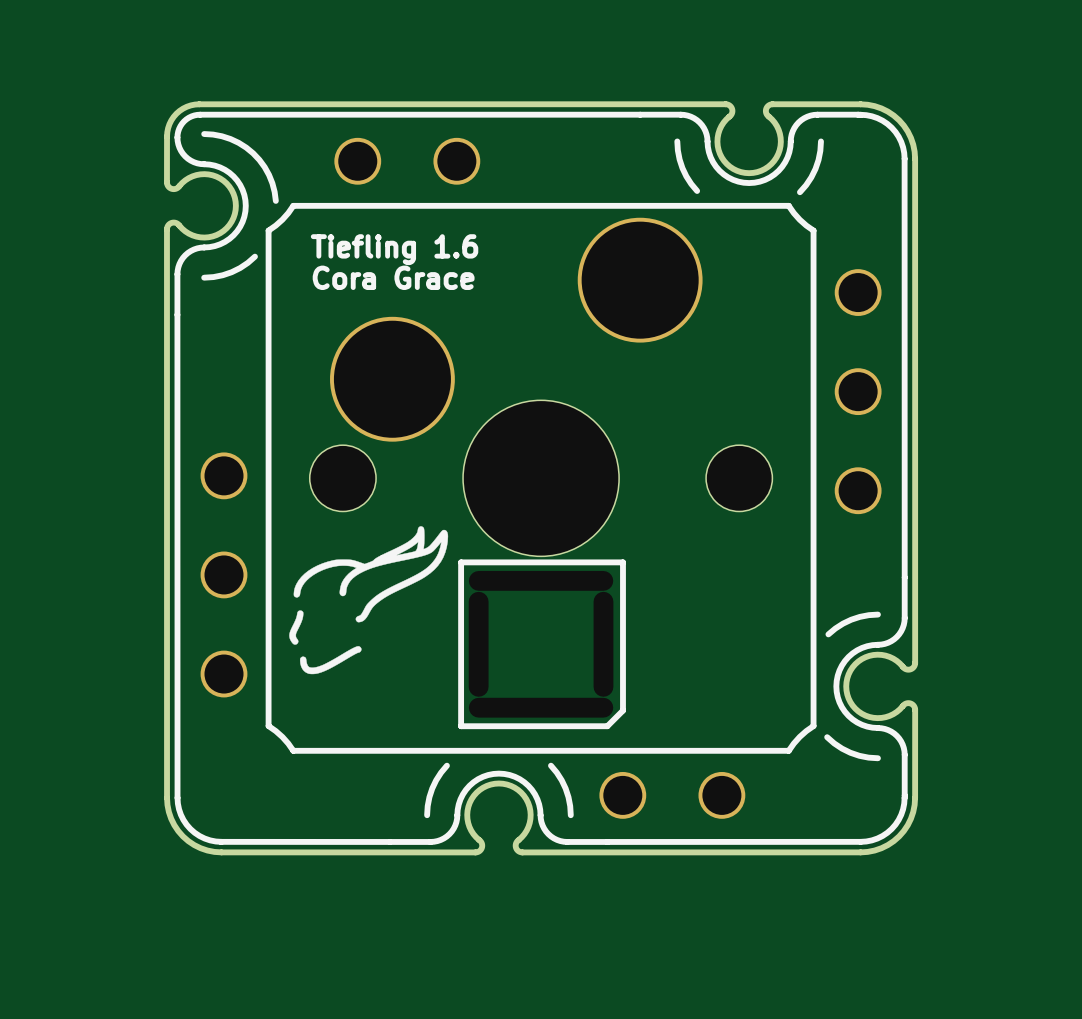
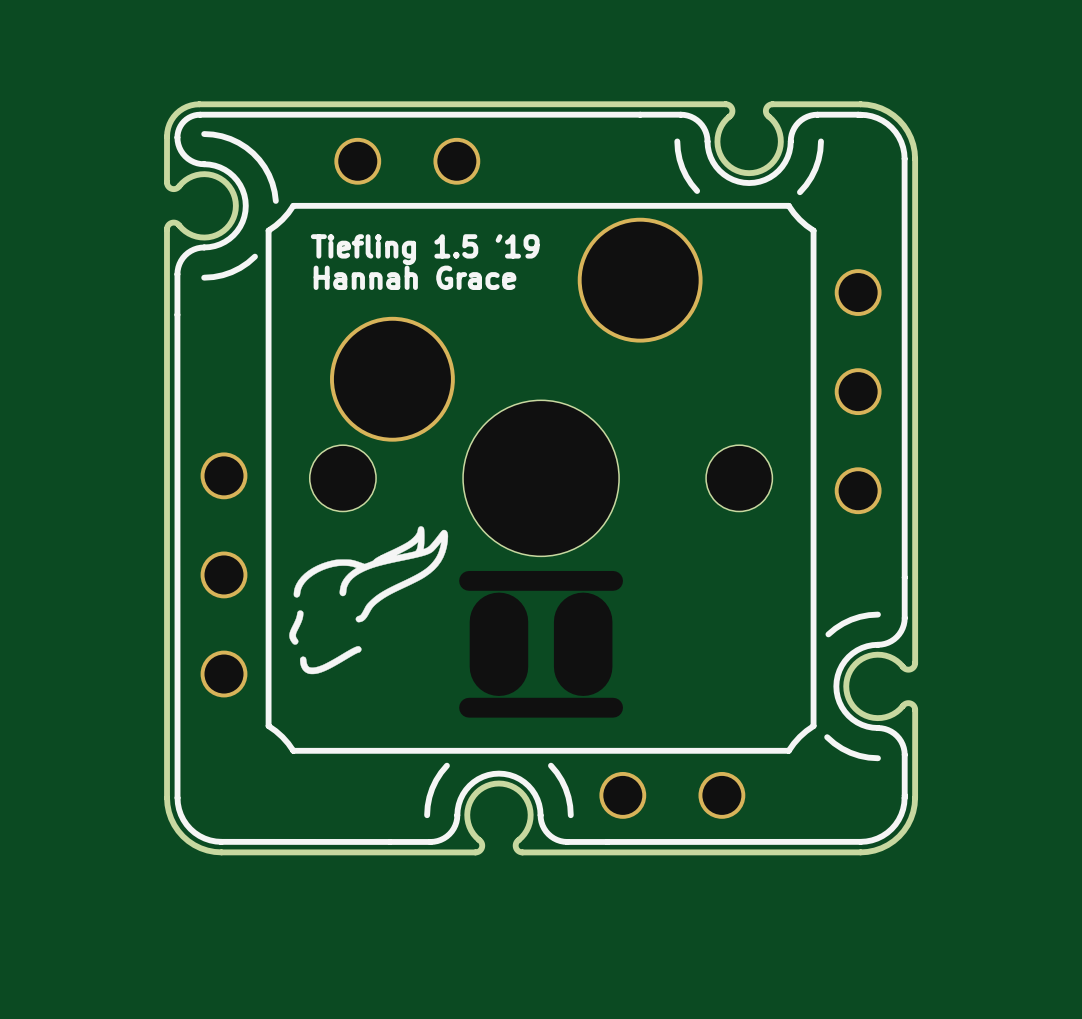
text: Tiefling 1.6 (394, 249) -> Tiefling 1.5 '19 (425, 249)
text: Cora Grace (393, 277) -> Hannah Grace (414, 277)
part footprint: [458, 559, 626, 730] -> [459, 570, 623, 718]

